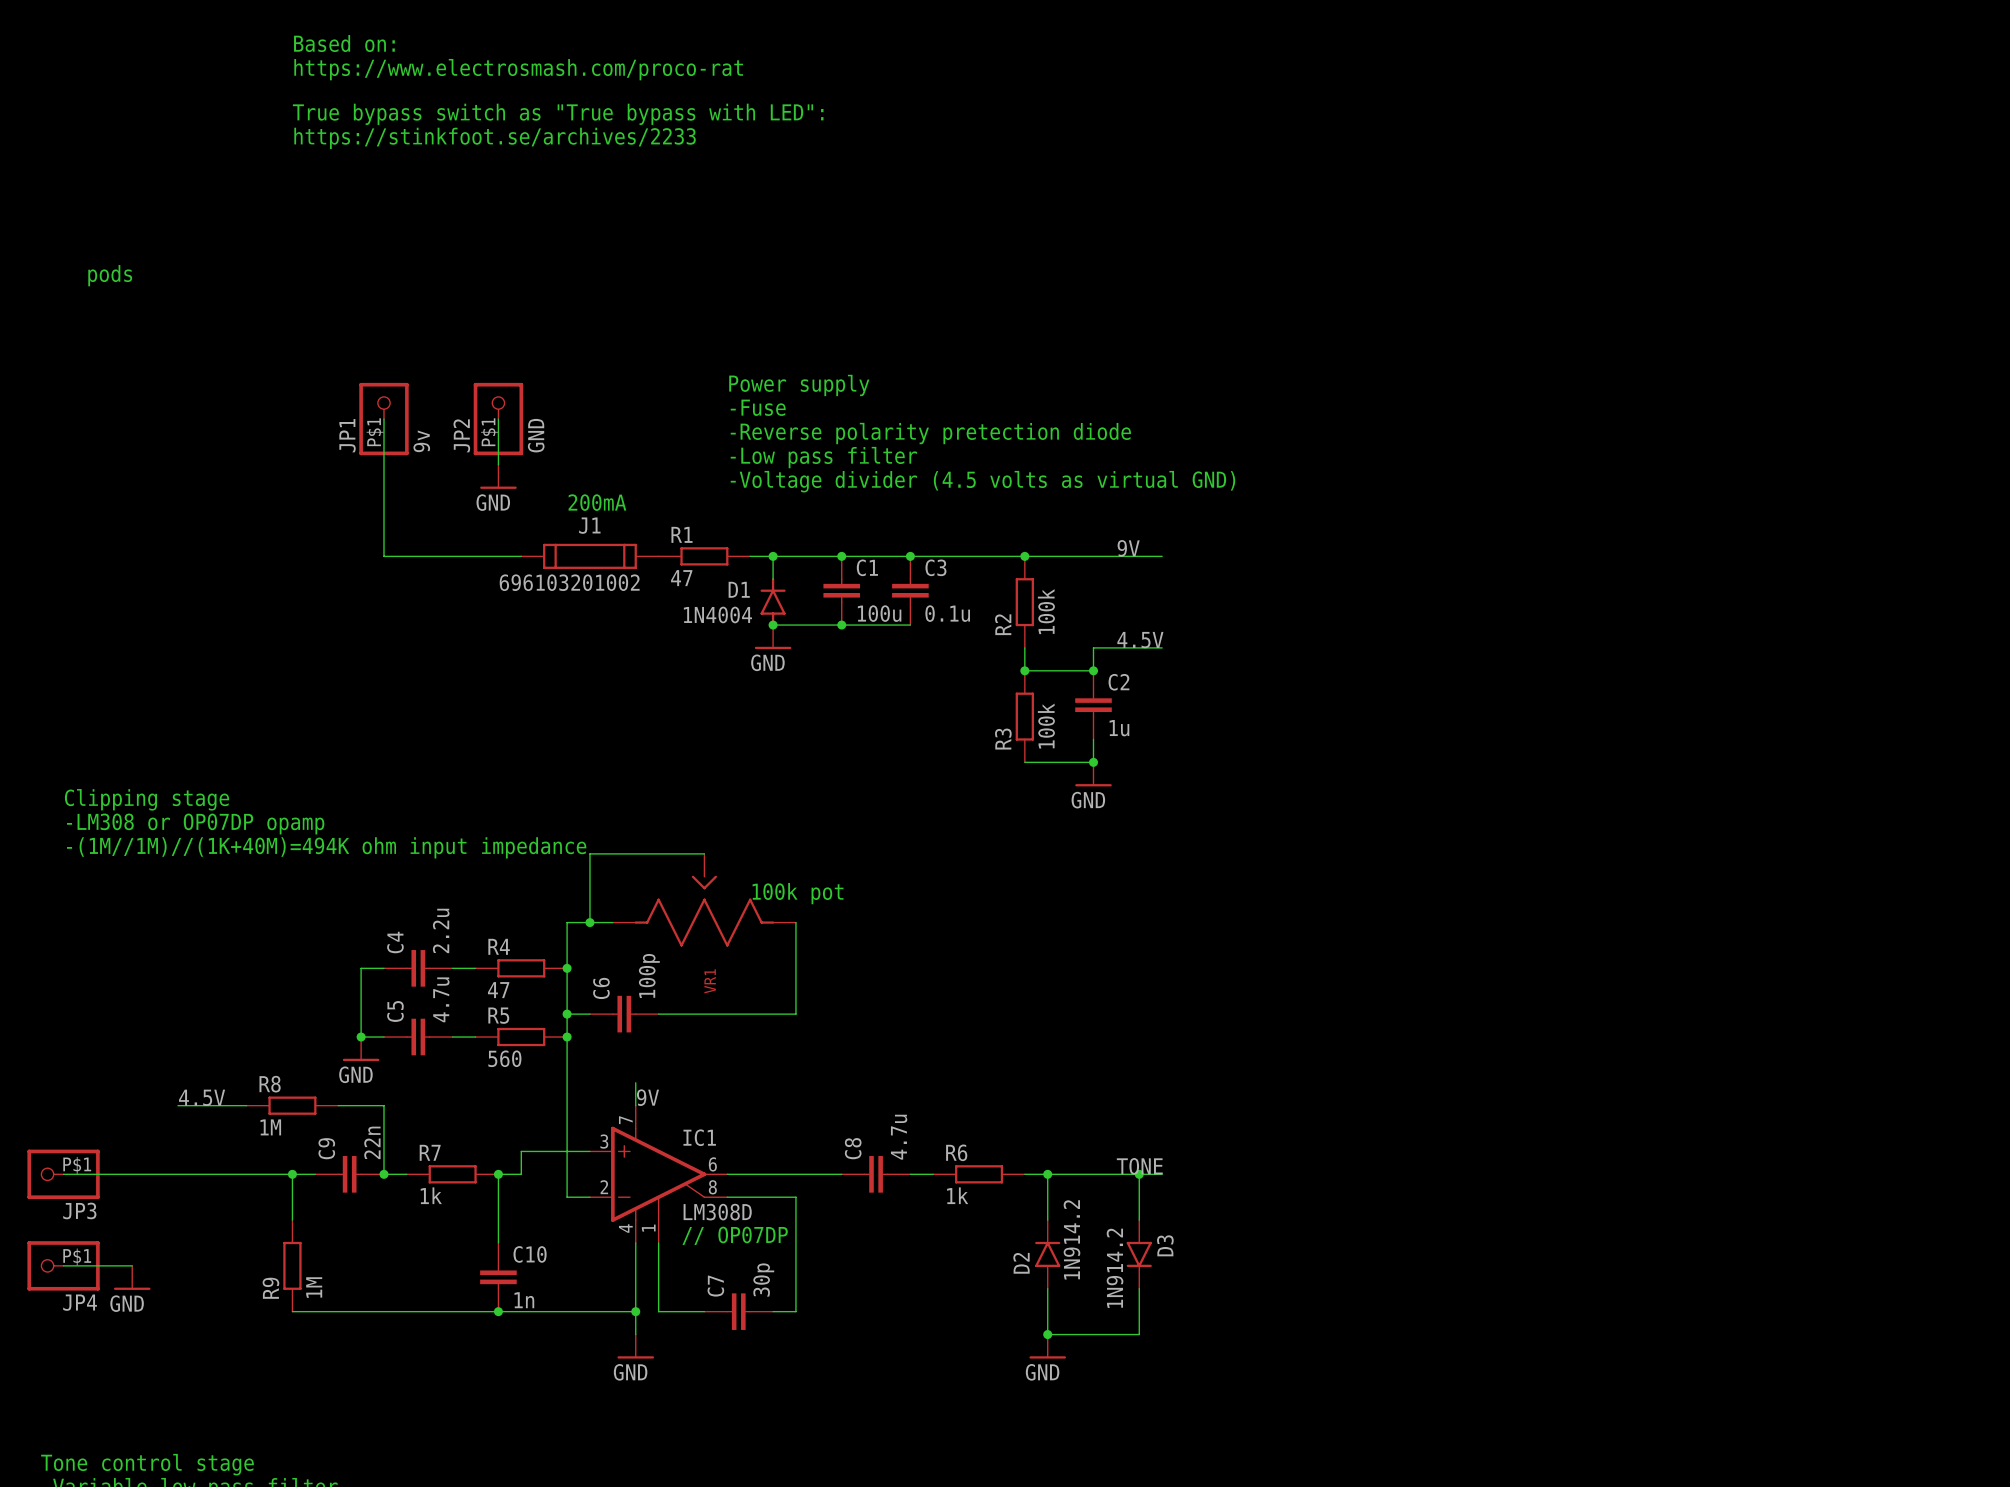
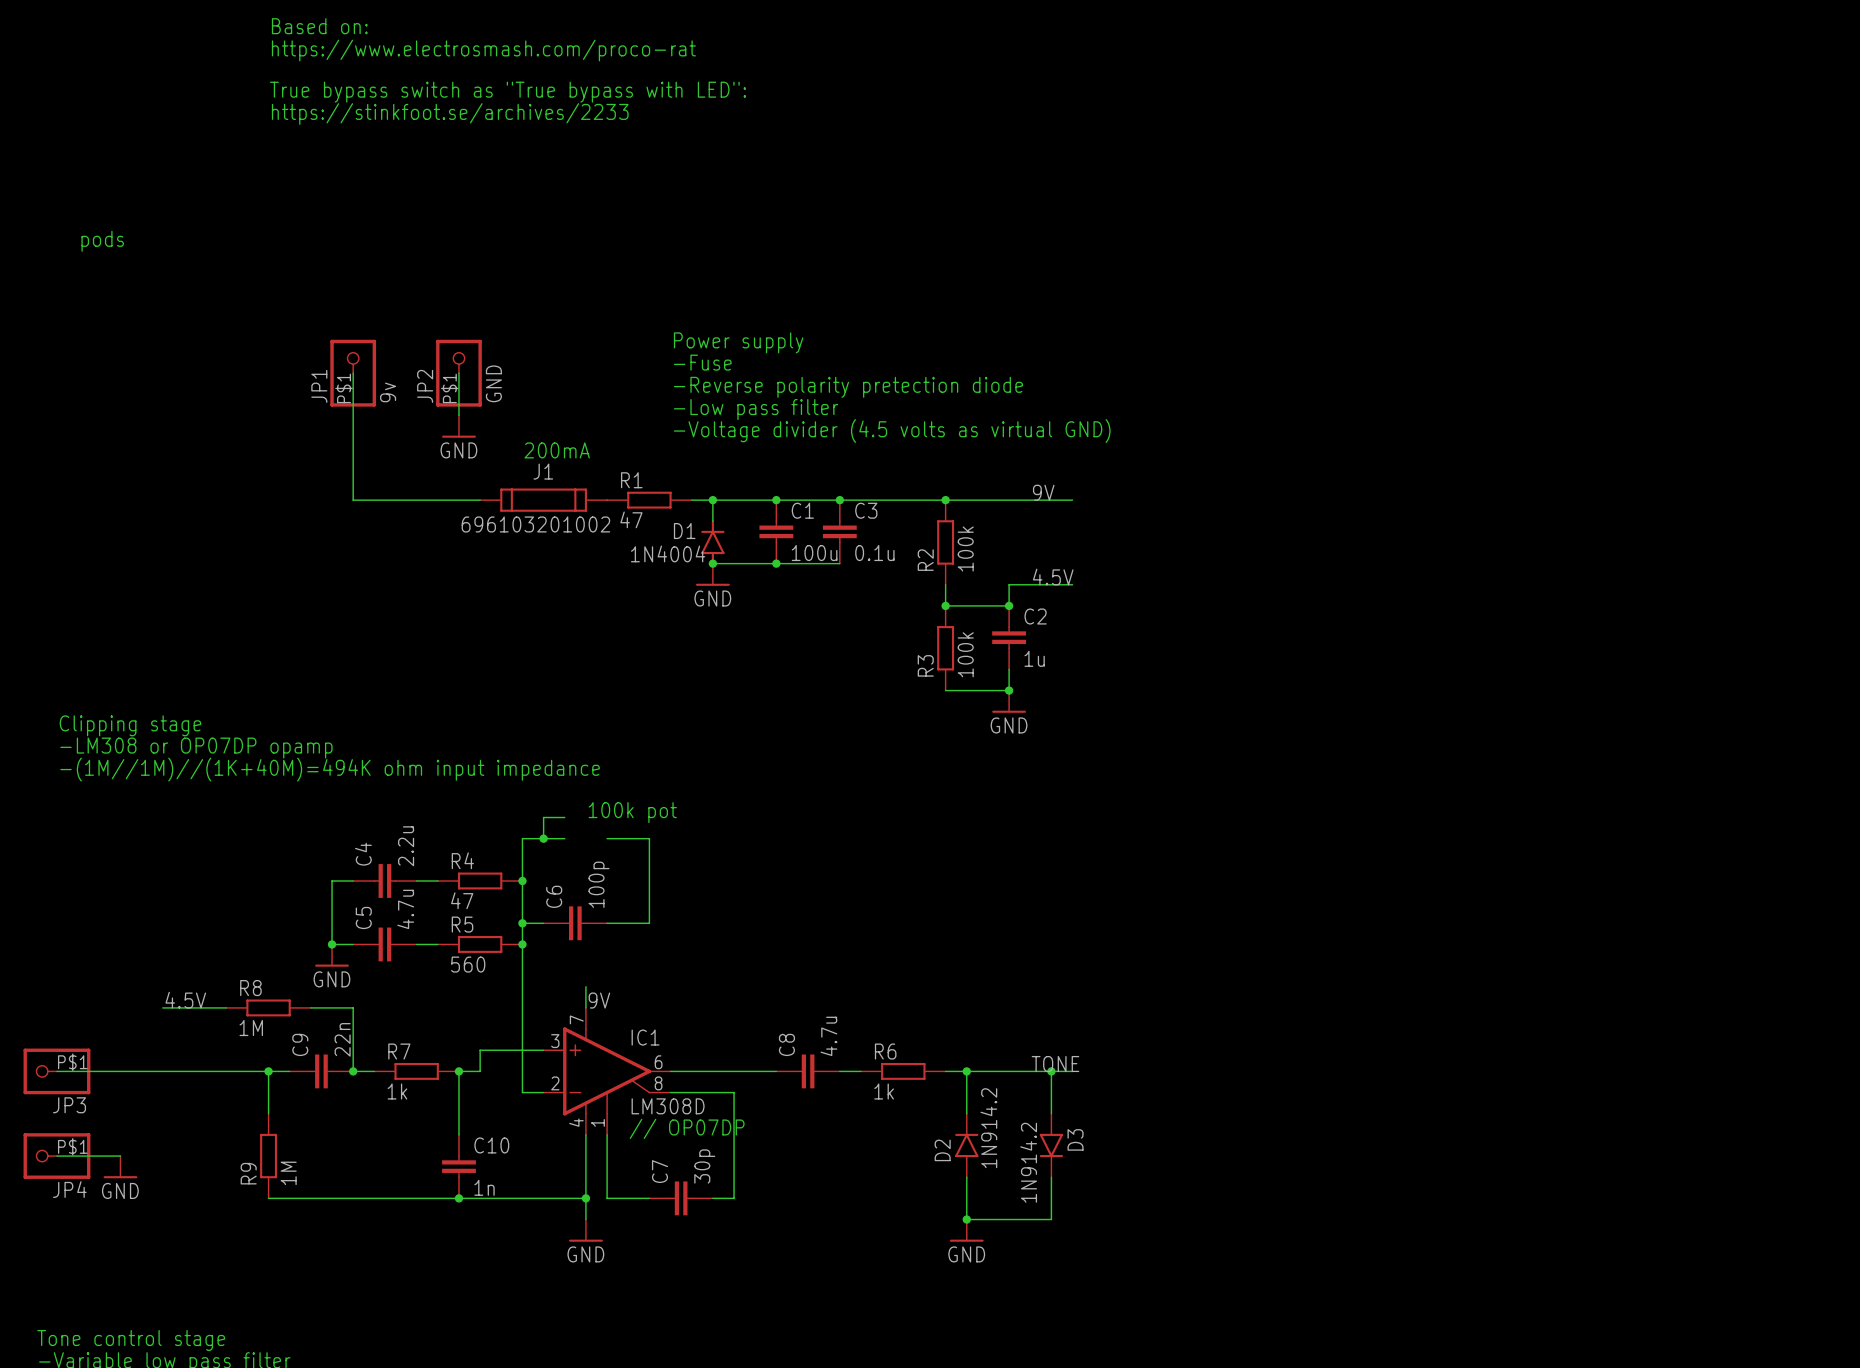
wire: (704, 853) (589, 853) (589, 899) -> (564, 817) (543, 817)
text position: 100k pot (798, 893) -> 100k pot (632, 812)
VR1: (704, 900) -> none
wire: (795, 922) (795, 1014) (704, 1014) -> (607, 838) (649, 838) (649, 923)

